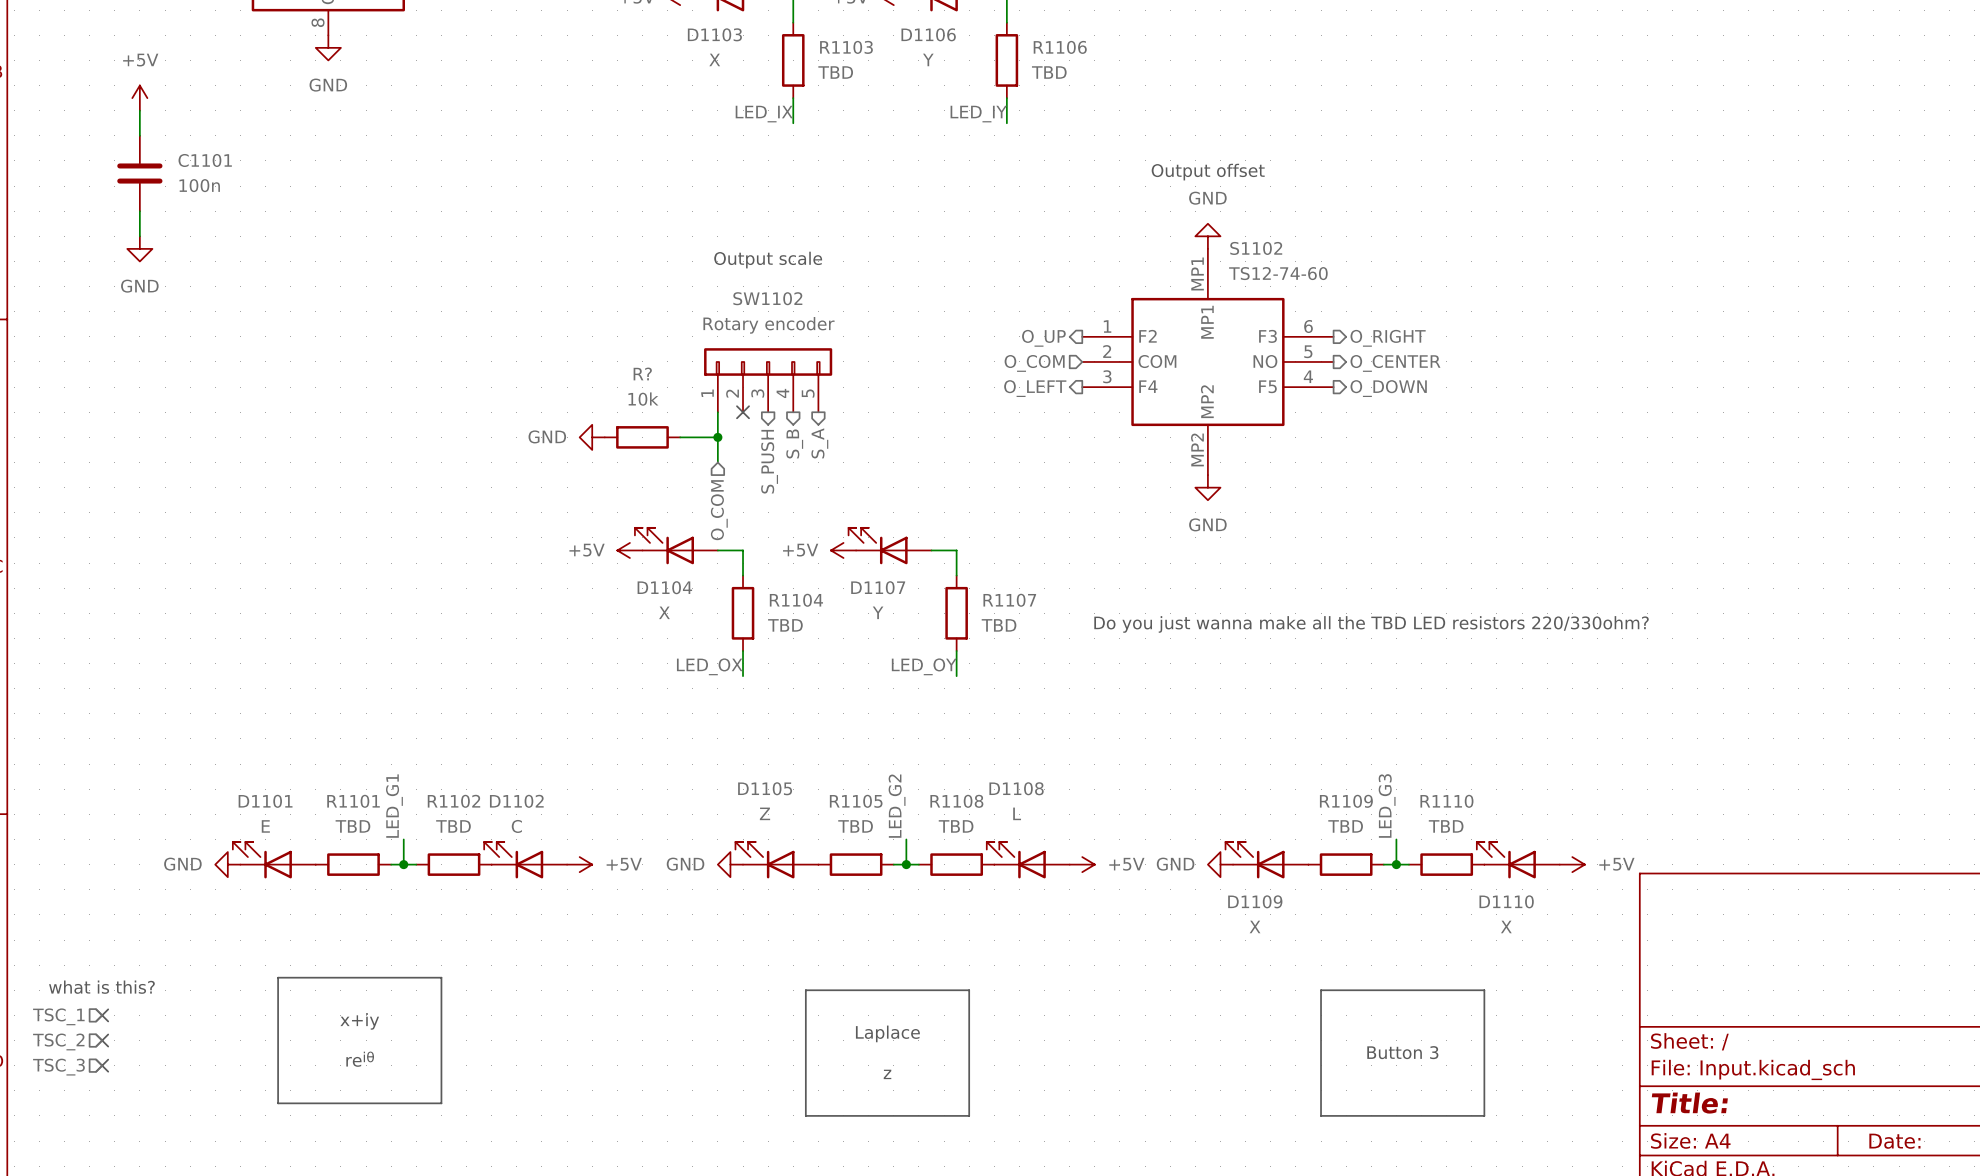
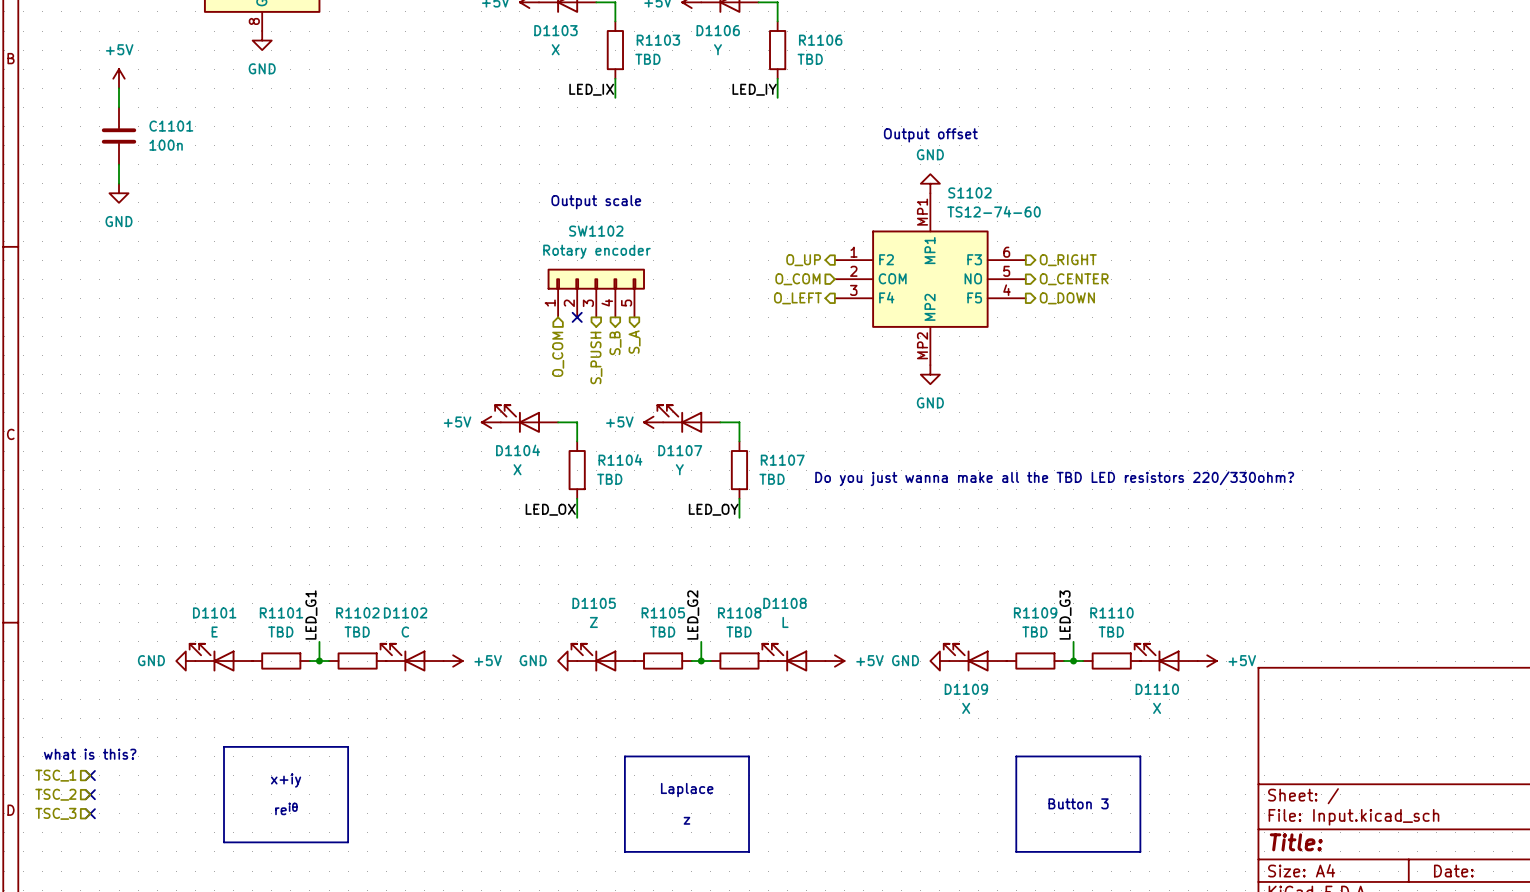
wire: (717, 412) (717, 462) -> none
power symbol: GND (592, 437) -> none
R?: 10k (642, 437) -> none
wire: (680, 437) (717, 437) -> none
junction: (717, 437) -> none
hierarchical label position: O_COM (719, 510) -> O_COM (558, 354)

